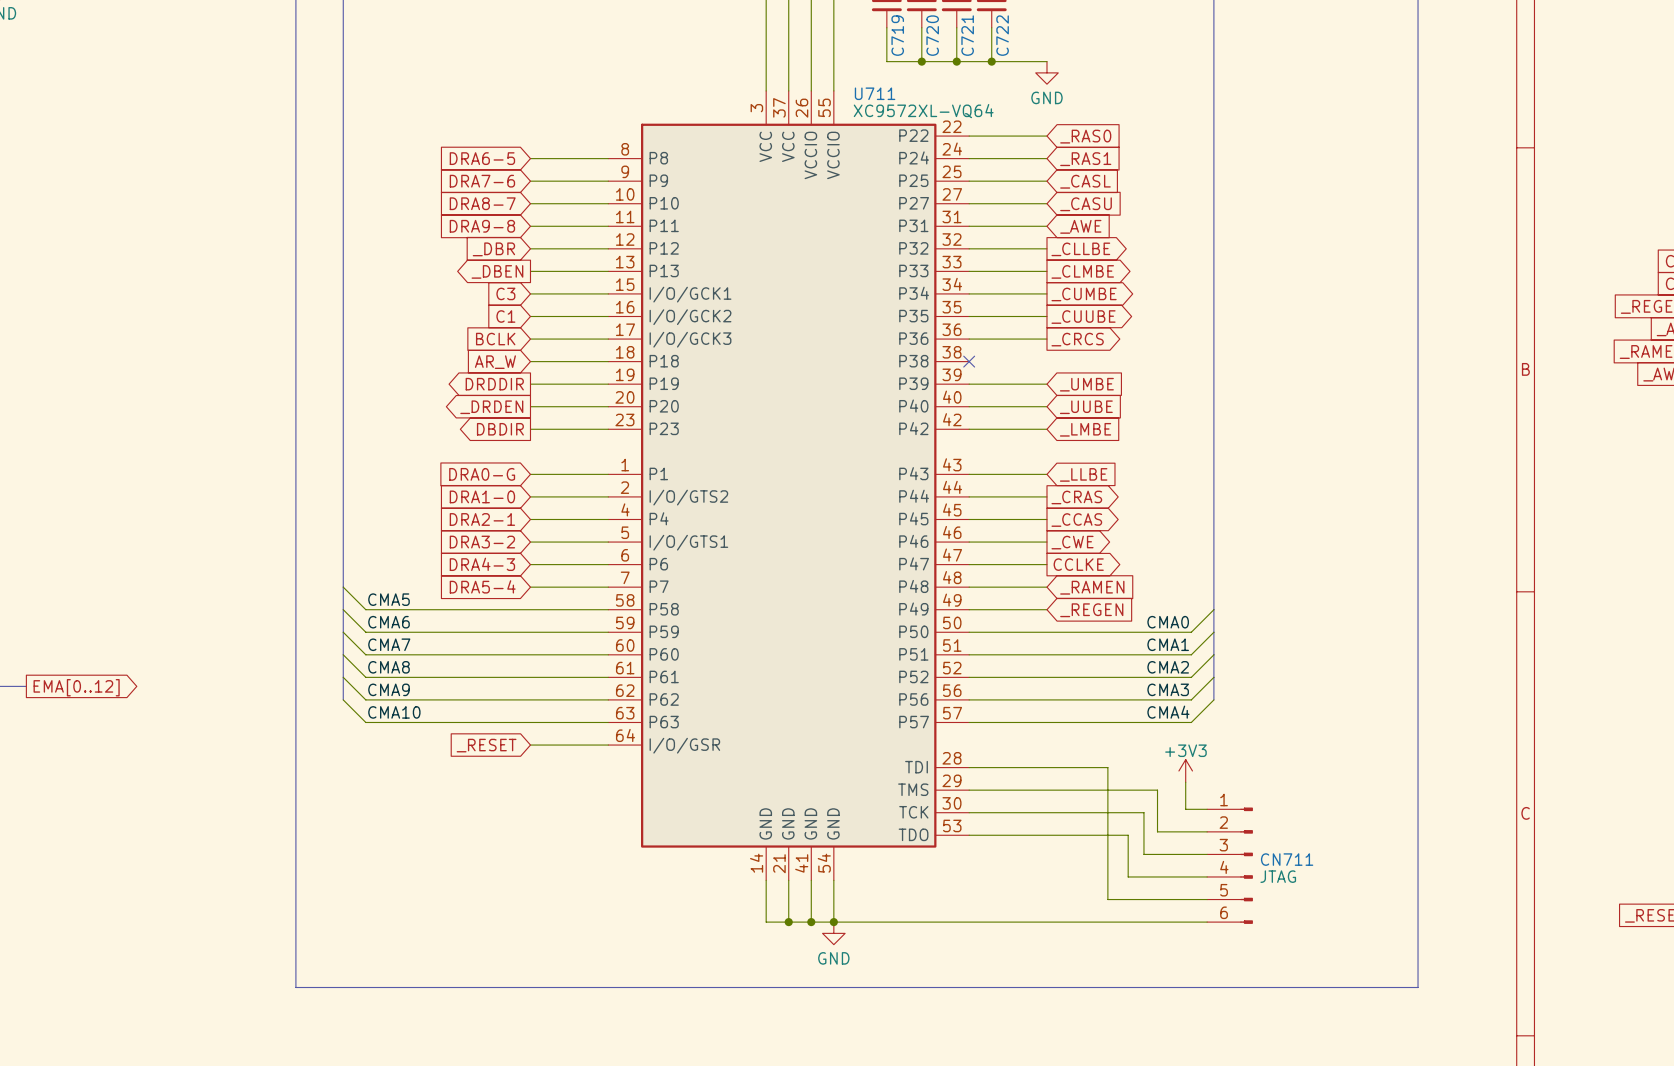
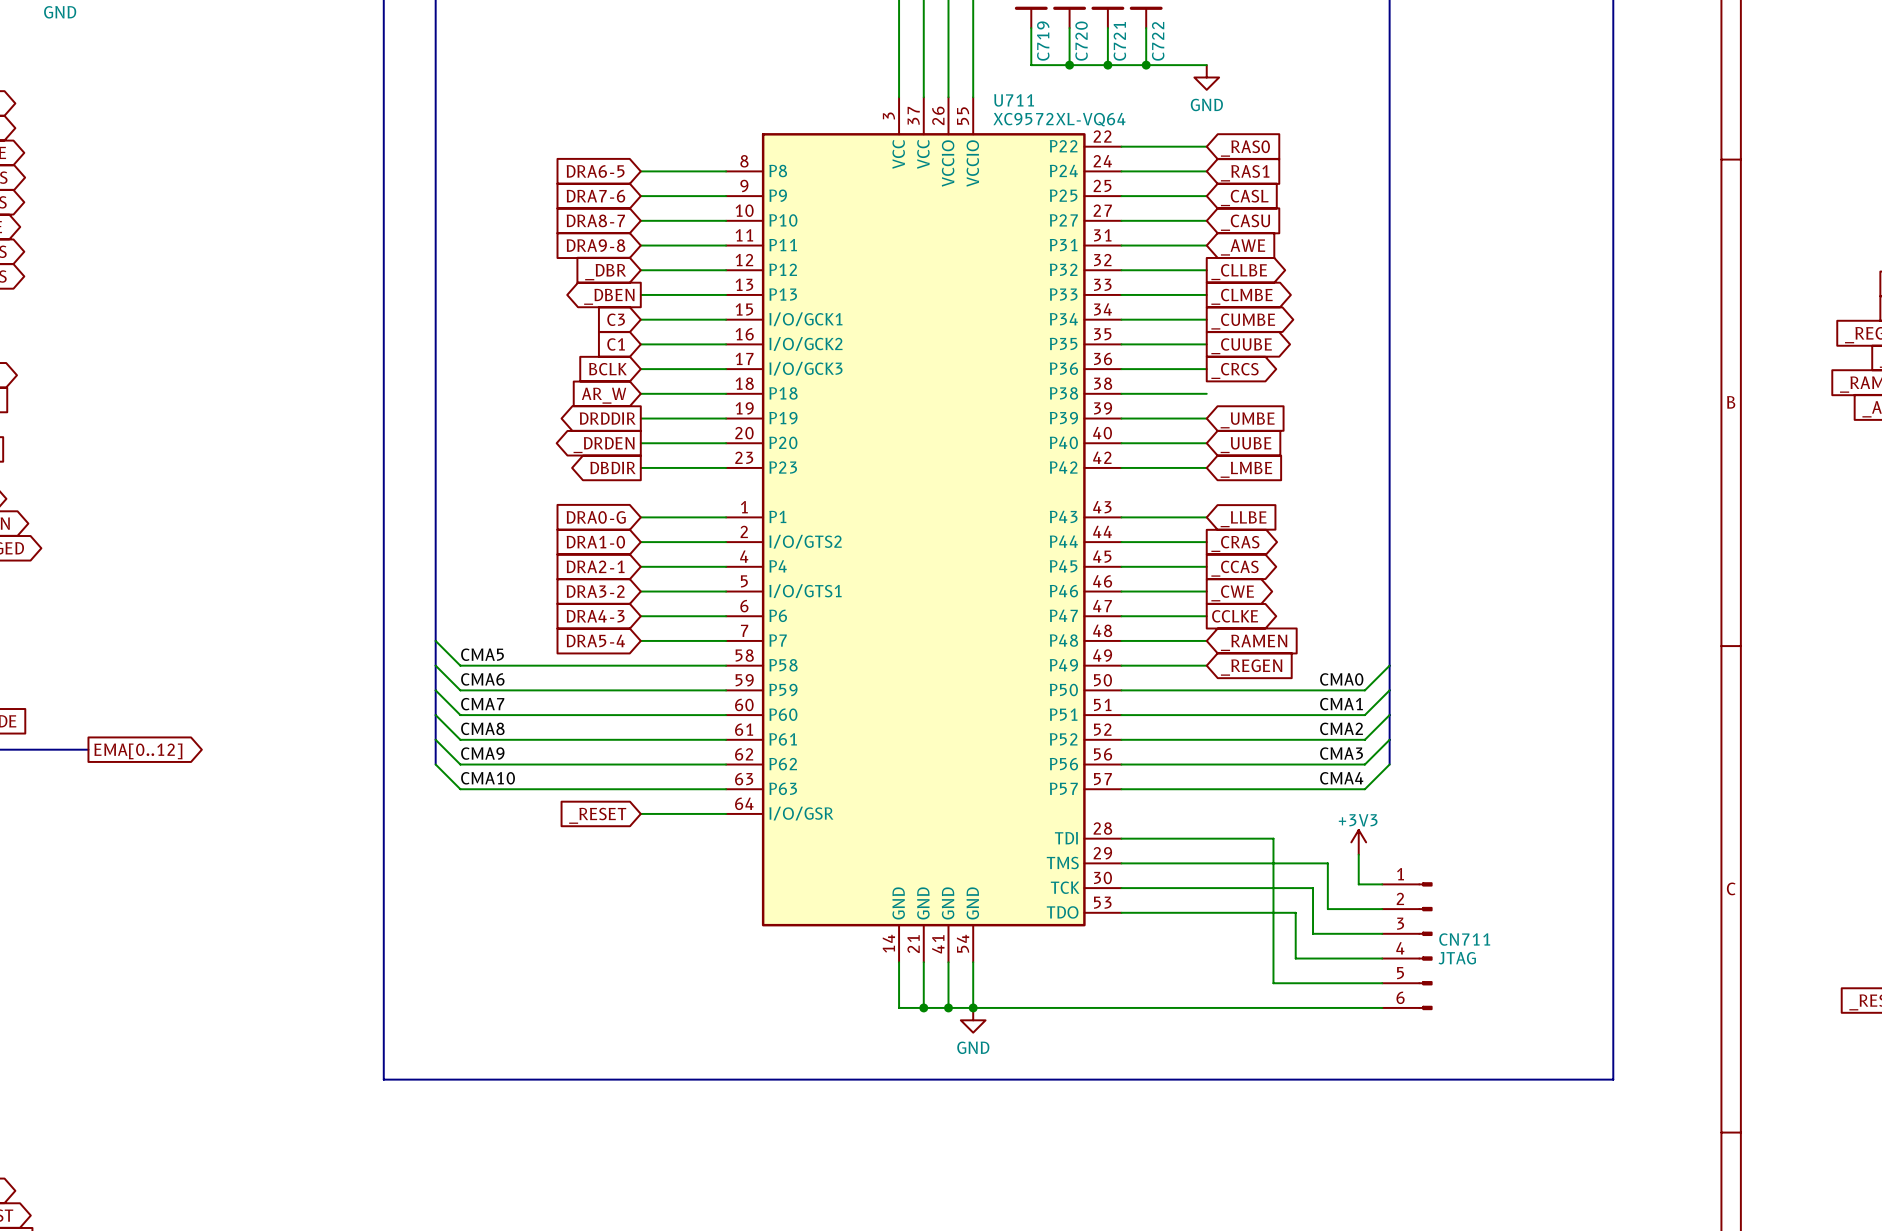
wire: none -> (1121, 393) (1206, 393)
no-connect mark: (969, 361) -> none

